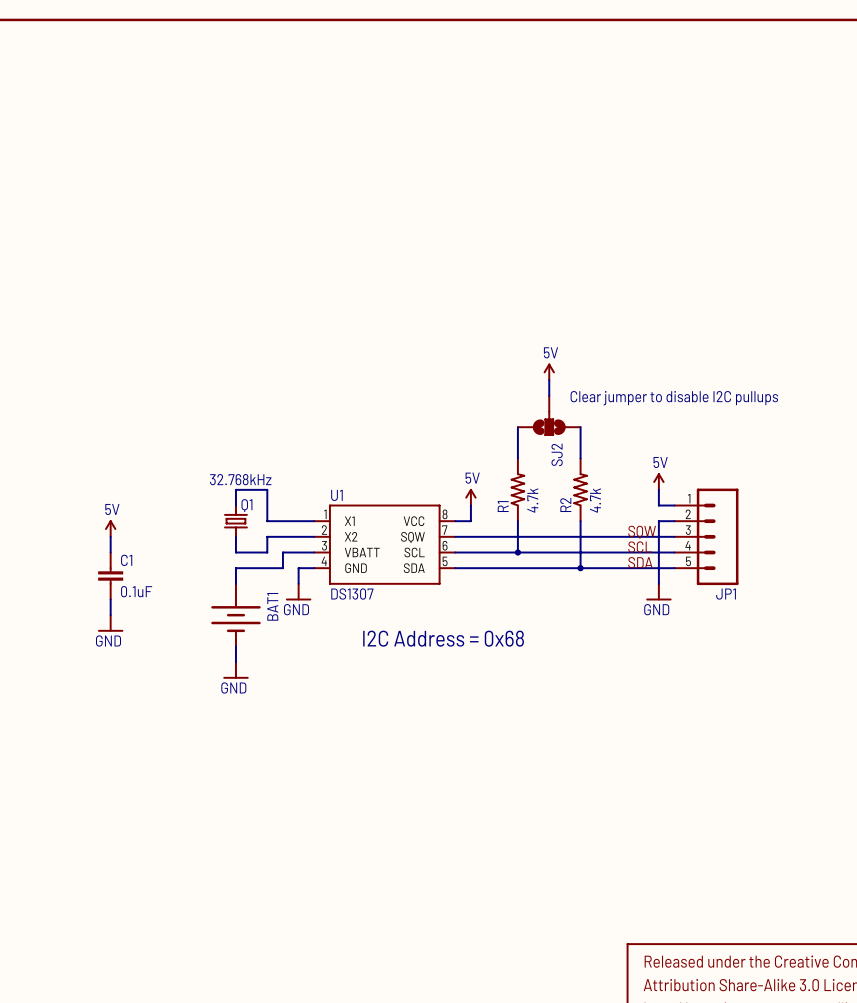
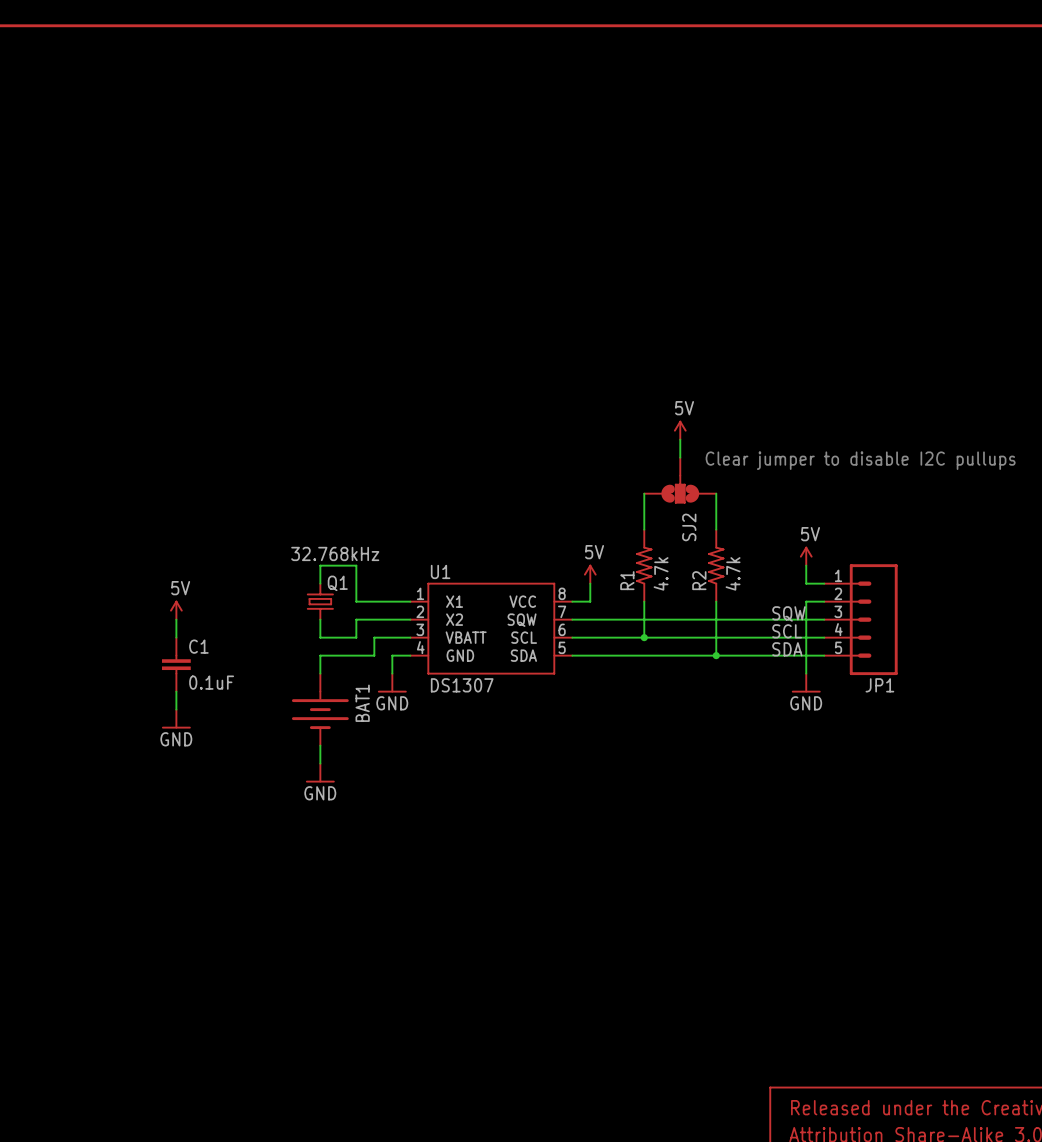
text: I2C Address = 0x68 (443, 638) -> none

